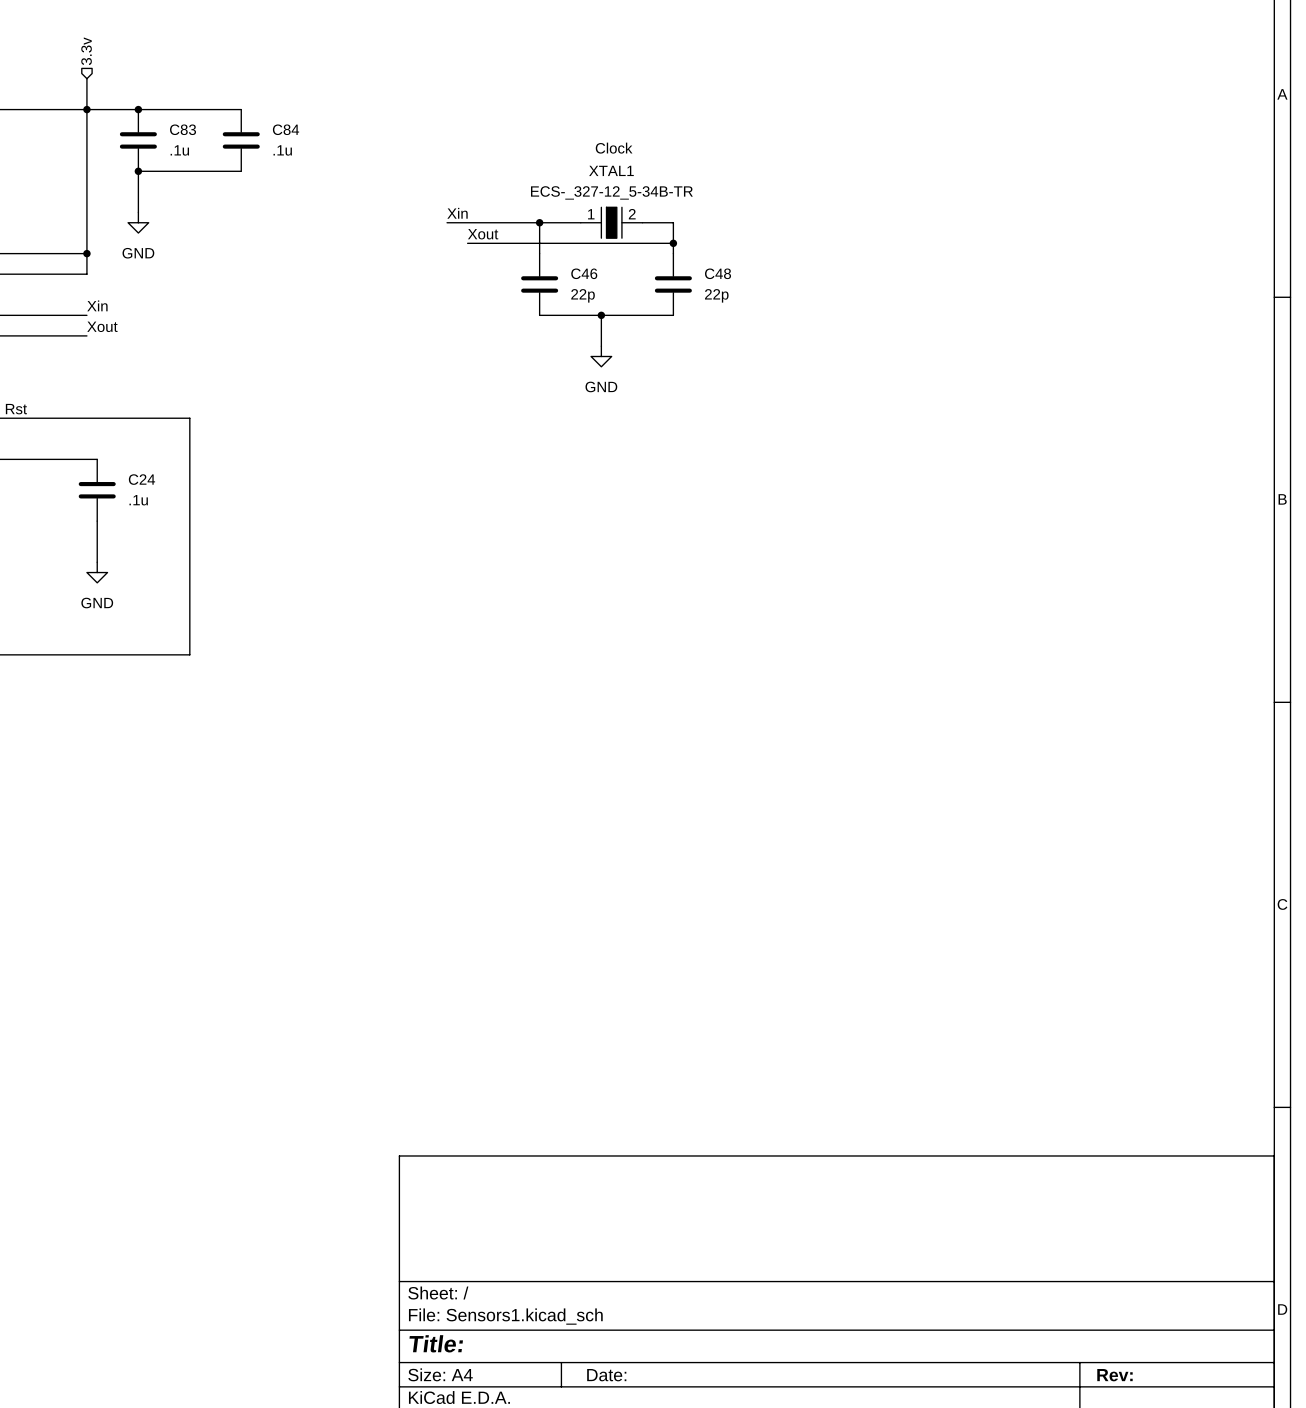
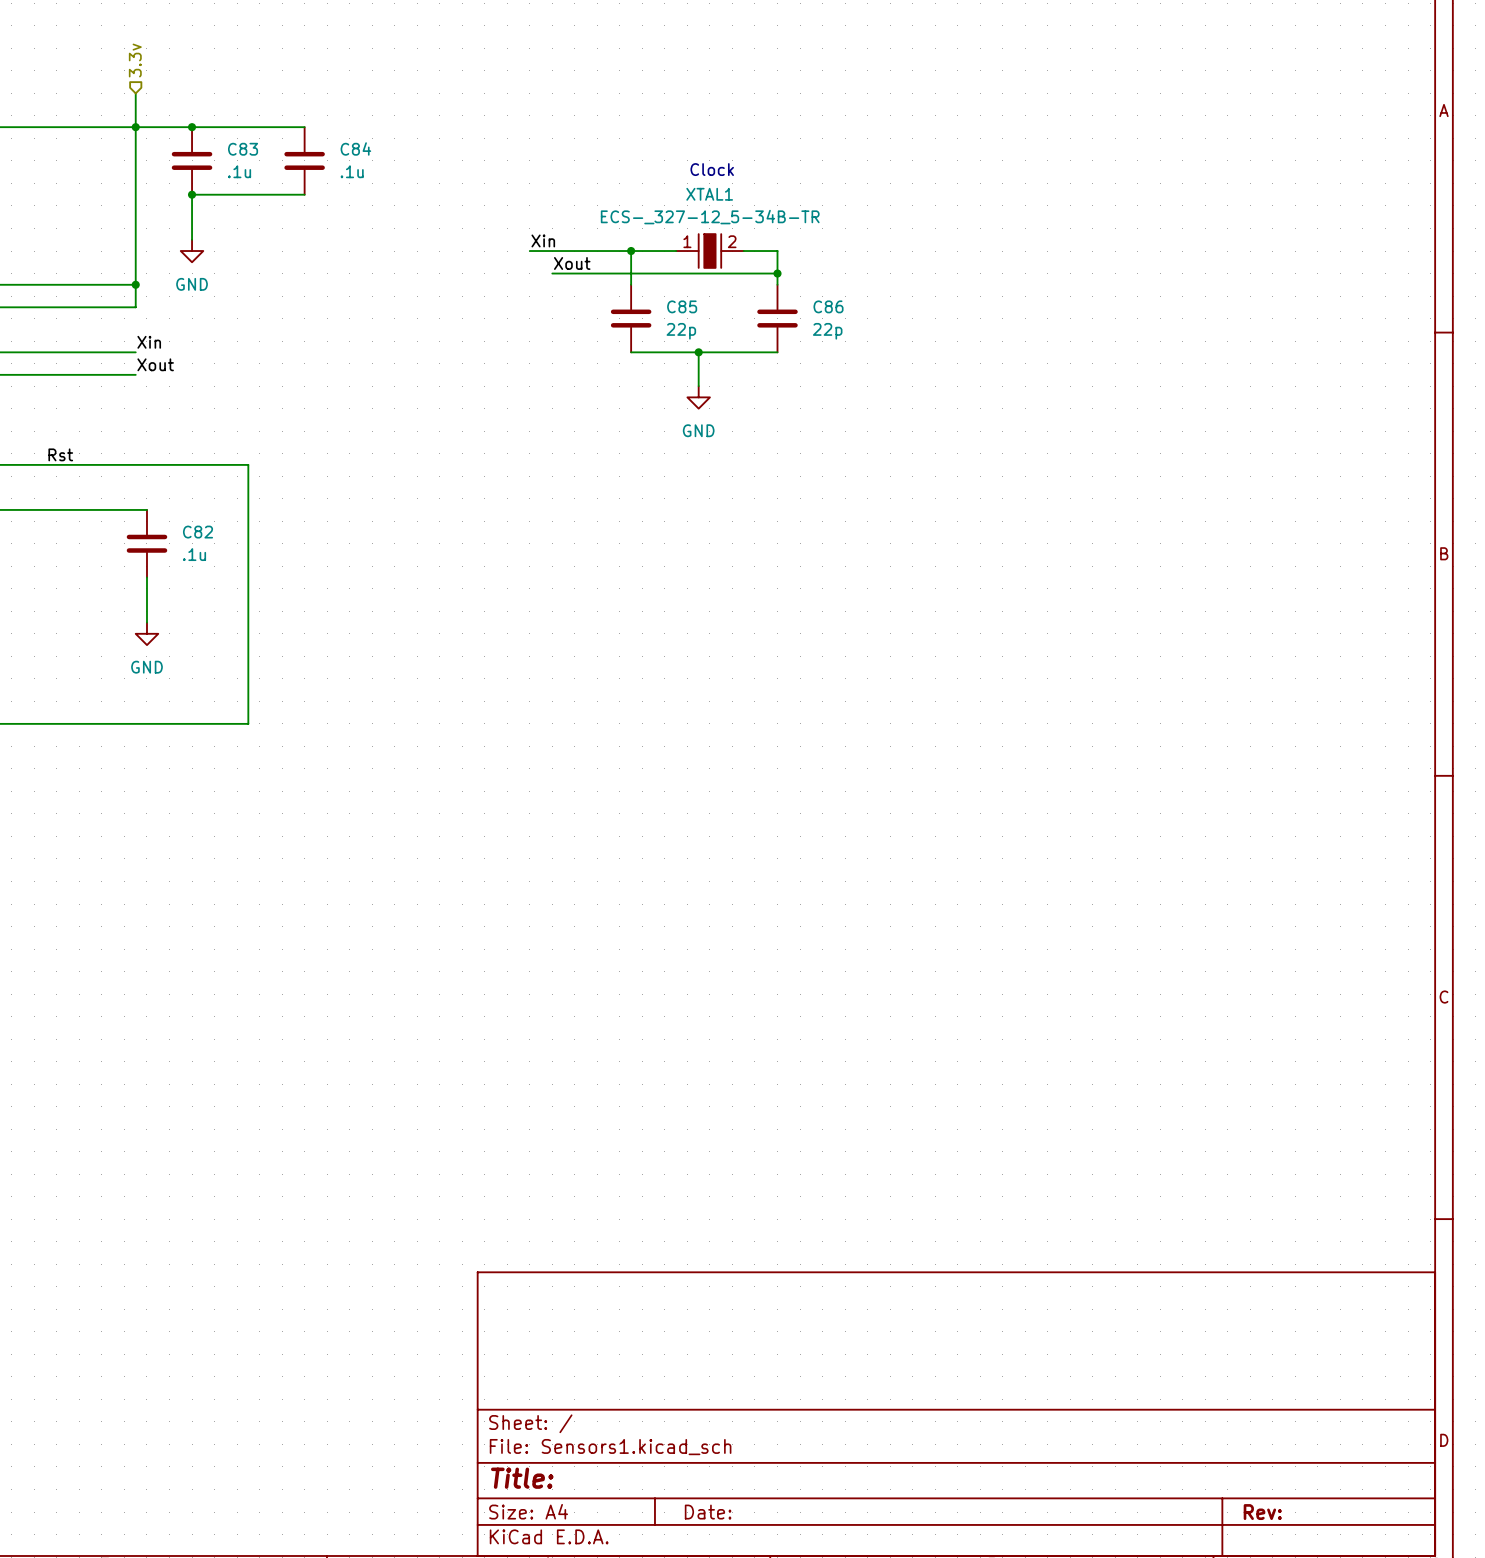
C46 name: C46 (584, 273) -> C85 (682, 306)
C48 name: C48 (718, 273) -> C86 (828, 306)
C24 name: C24 (141, 479) -> C82 (198, 532)

